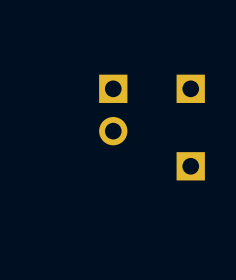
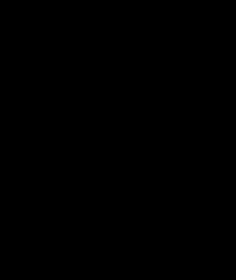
part: (190, 88) -> none
part: (113, 109) -> none
part: (190, 166) -> none

